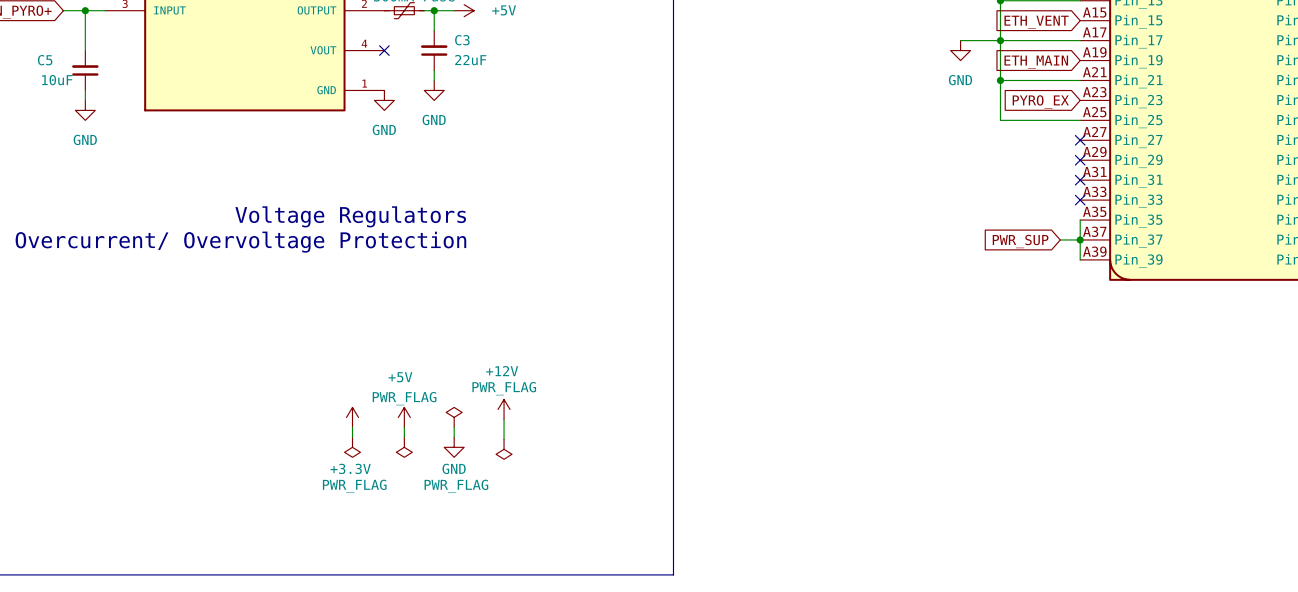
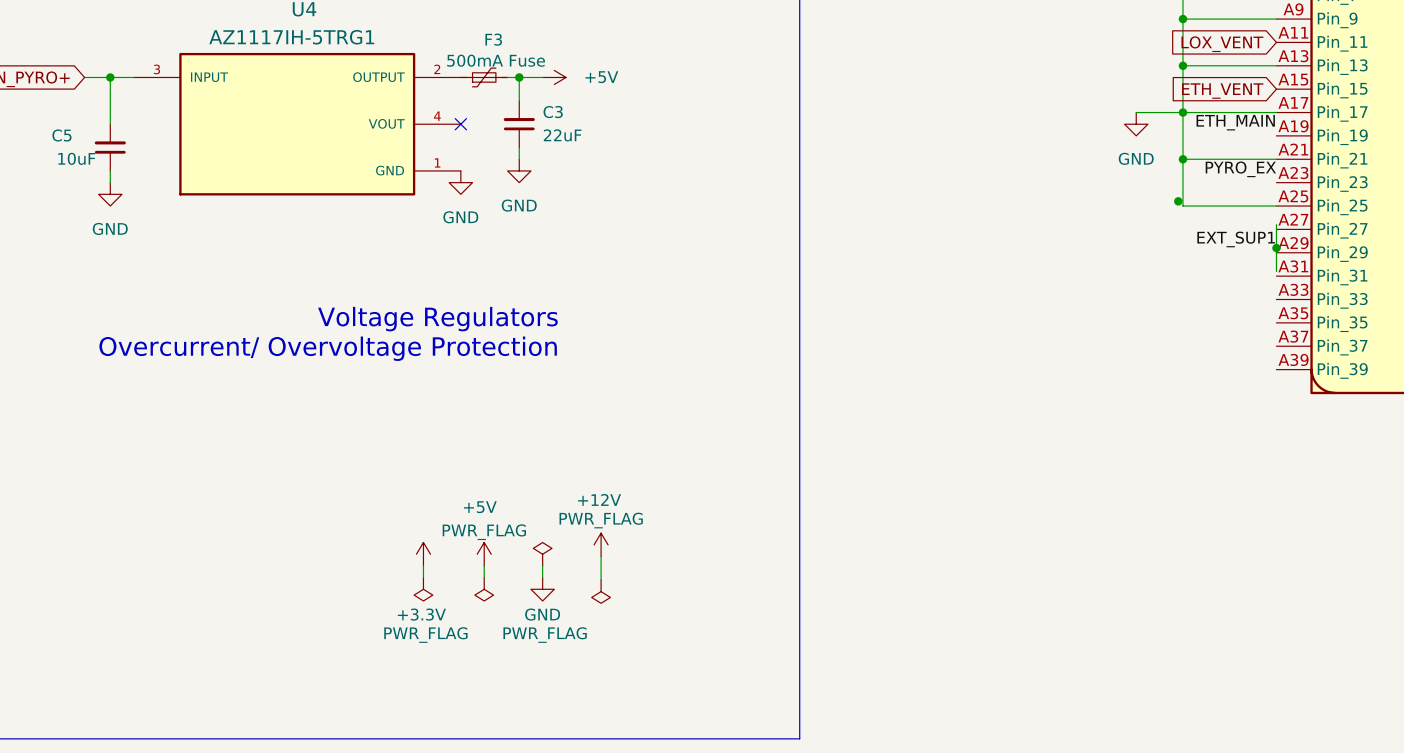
label: none -> ETH_MAIN (1235, 122)
global label: ETH_MAIN (1036, 62) -> none
label: none -> PYRO_EX (1240, 169)
global label: PYRO_EX (1040, 101) -> none
junction: none -> (1178, 201)
no-connect mark: (1080, 140) -> none
label: none -> EXT_SUP1 (1236, 239)
junction: none -> (1276, 248)
no-connect mark: (1080, 160) -> none
no-connect mark: (1080, 180) -> none
no-connect mark: (1080, 200) -> none
wire: (1080, 220) (1080, 259) -> (1276, 224) (1276, 271)
wire: (1060, 239) (1080, 239) -> none
junction: (1080, 239) -> none
global label: PWR_SUP (1020, 241) -> none

